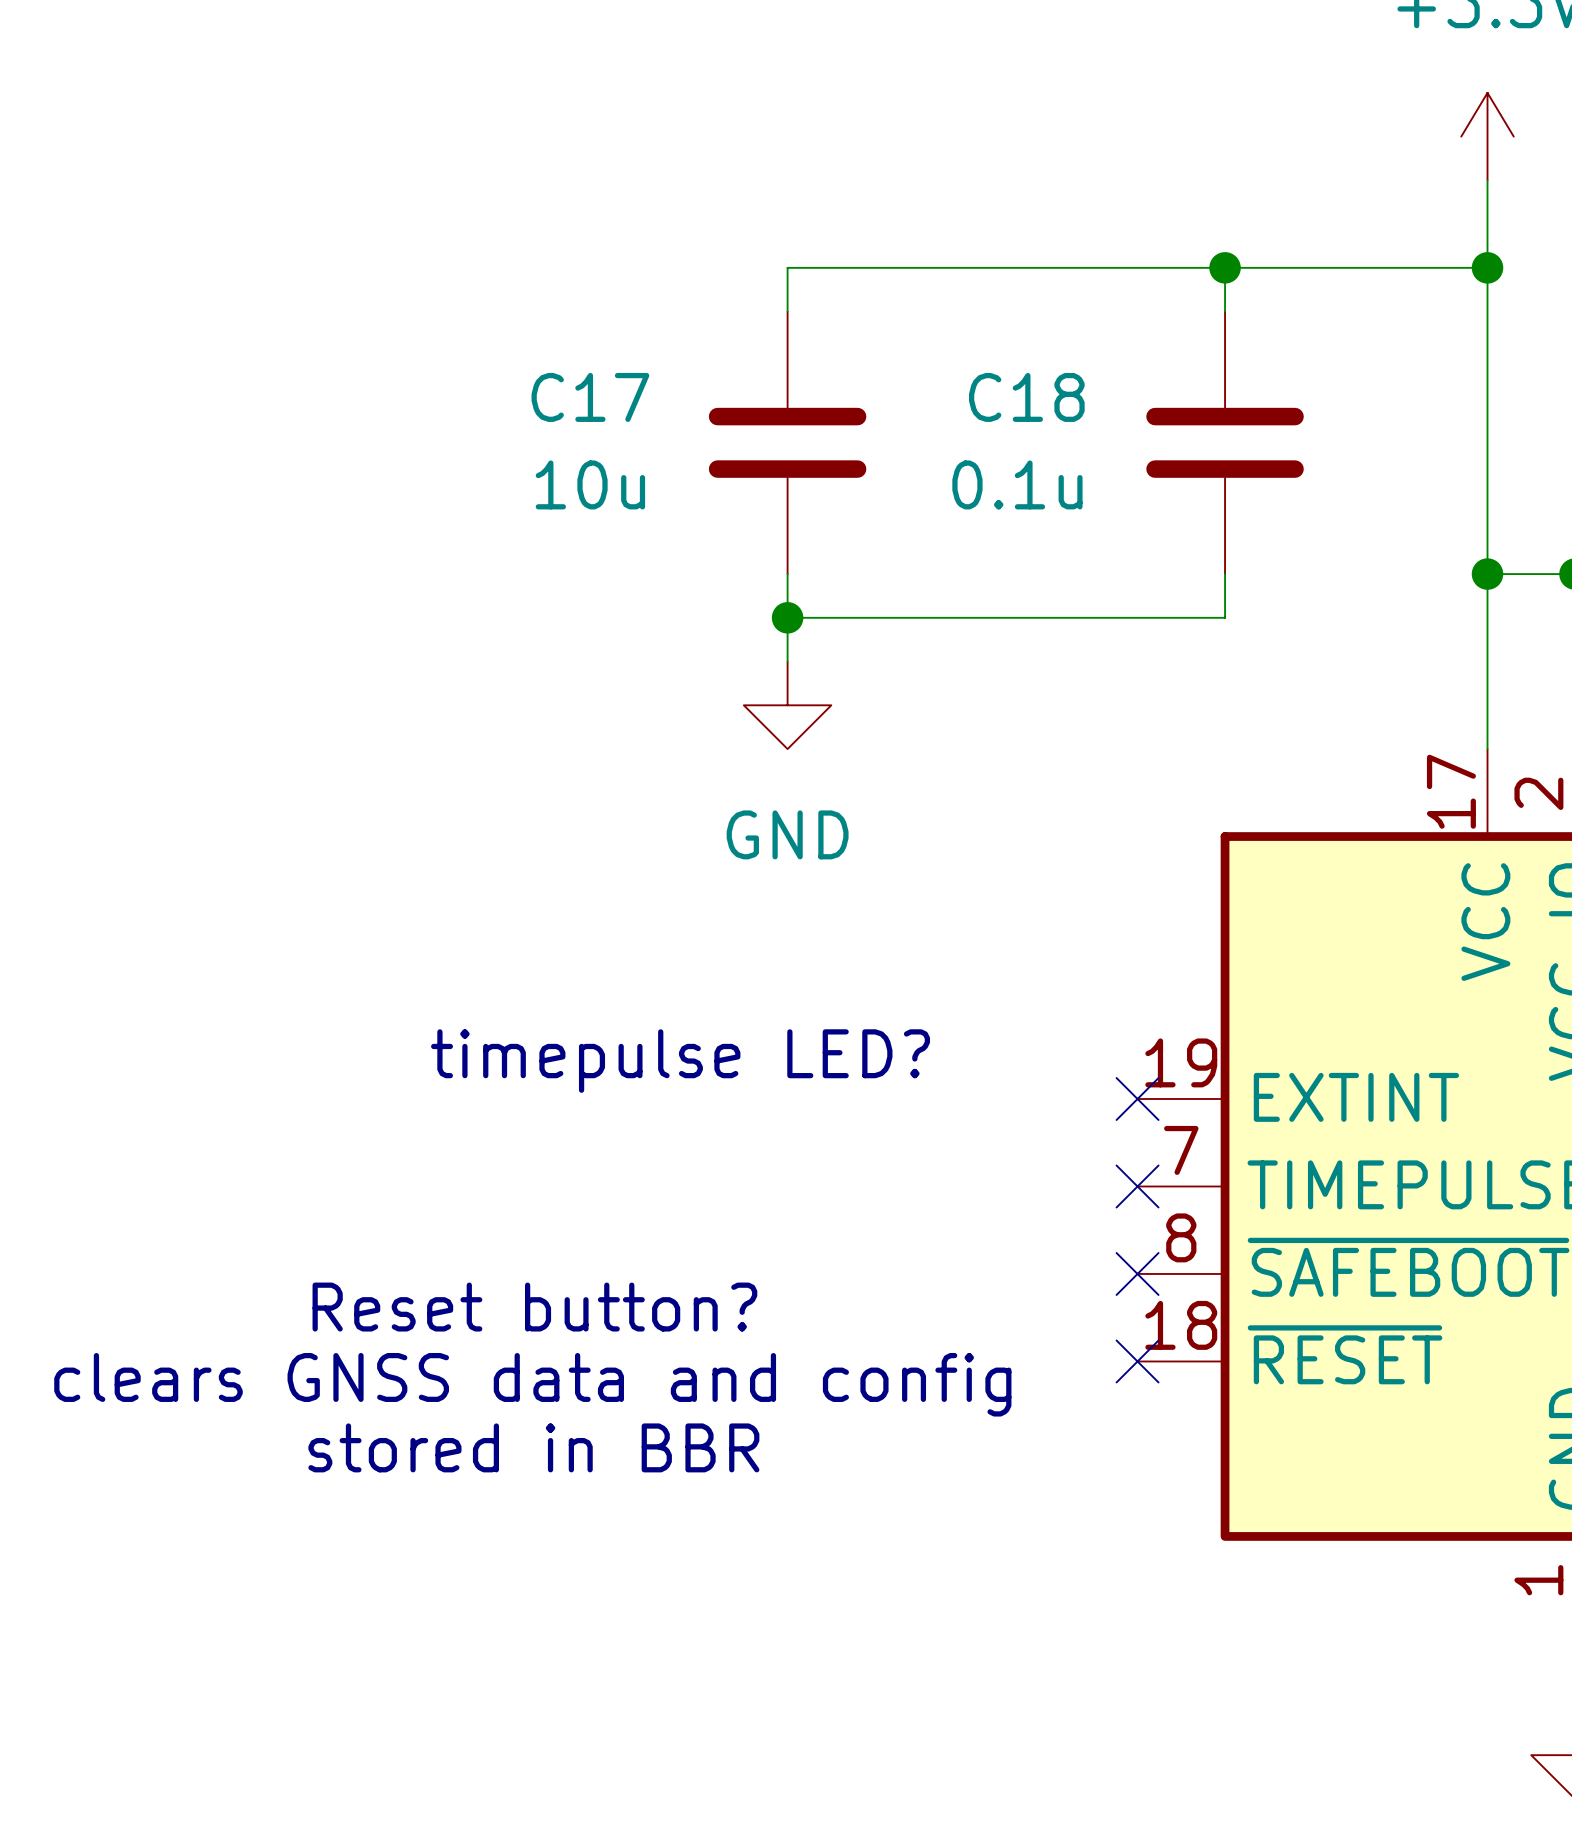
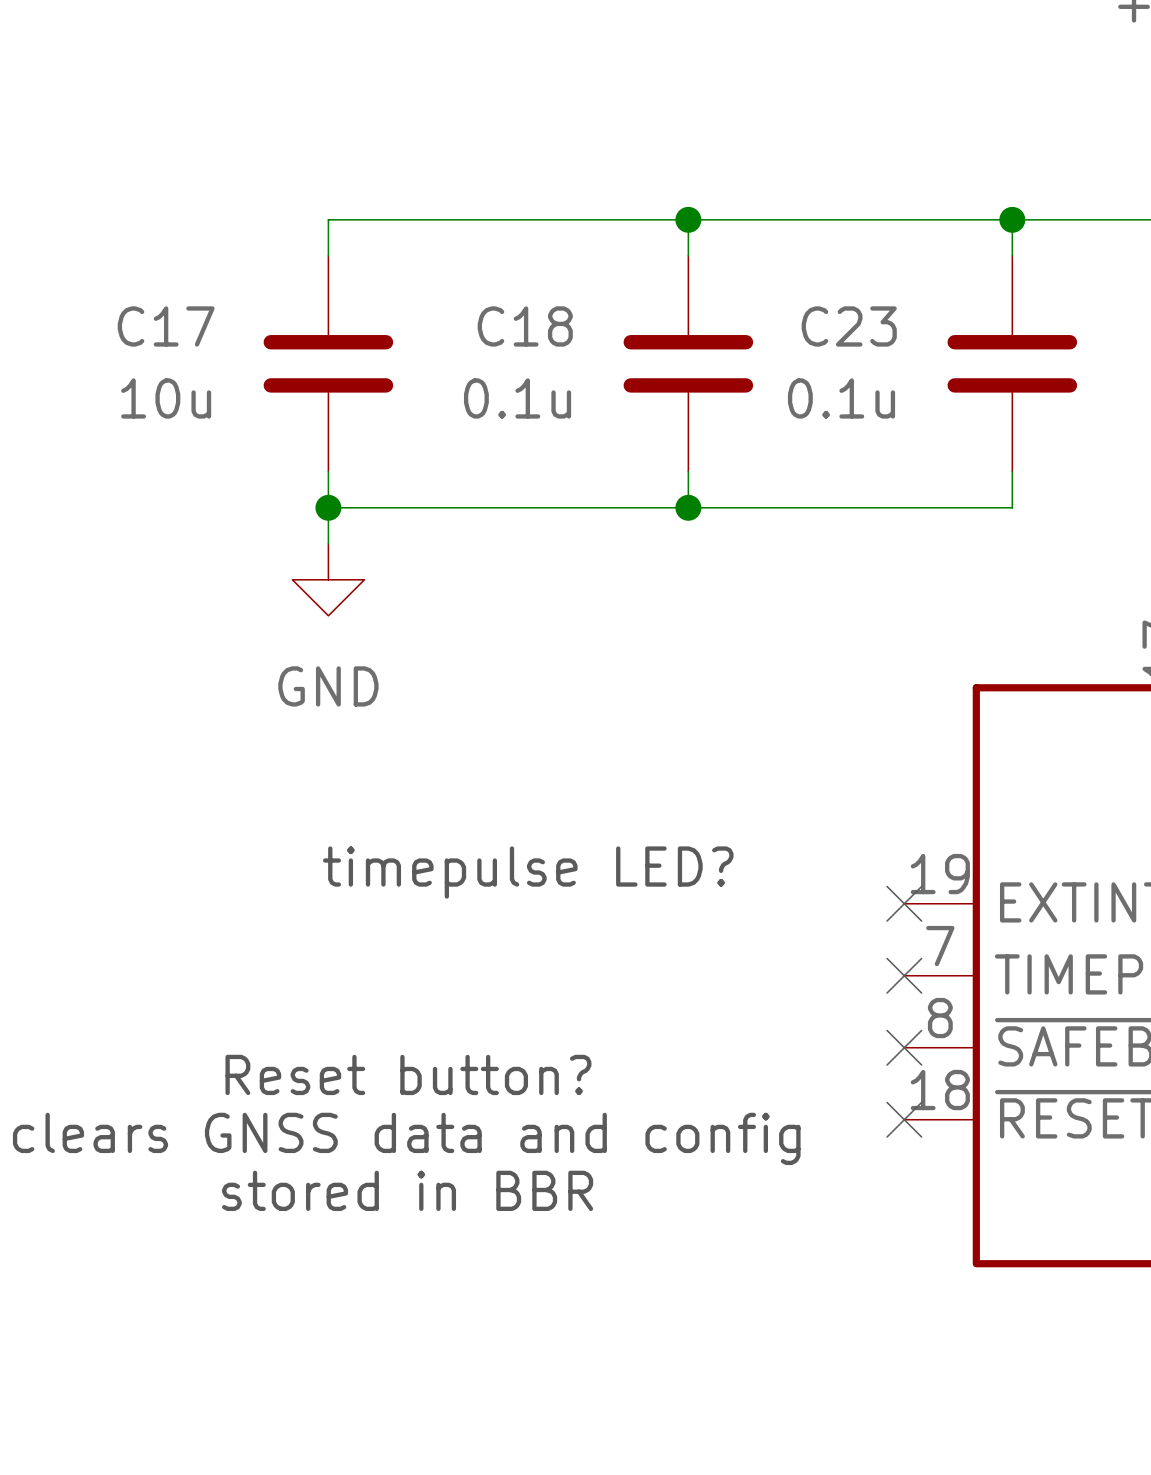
wire: (787, 267) (787, 311) -> (616, 219) (328, 219) (328, 255)
junction: none -> (688, 219)
wire: (1225, 267) (1225, 311) -> (688, 219) (688, 255)
junction position: (1225, 267) -> (1012, 219)
wire: none -> (1012, 219) (1012, 255)
C17 position: (787, 442) -> (328, 363)
C18 position: (1225, 442) -> (688, 363)
C23: none -> 0.1u (1012, 363)
wire: (787, 574) (787, 661) -> (328, 471) (328, 543)
wire: none -> (688, 471) (688, 507)
wire: (1225, 574) (1225, 617) -> (1012, 471) (1012, 507) (976, 507)
wire: none -> (328, 507) (616, 507)
junction: none -> (328, 507)
junction position: (787, 617) -> (688, 507)
power symbol position: GND (787, 705) -> GND (328, 579)

